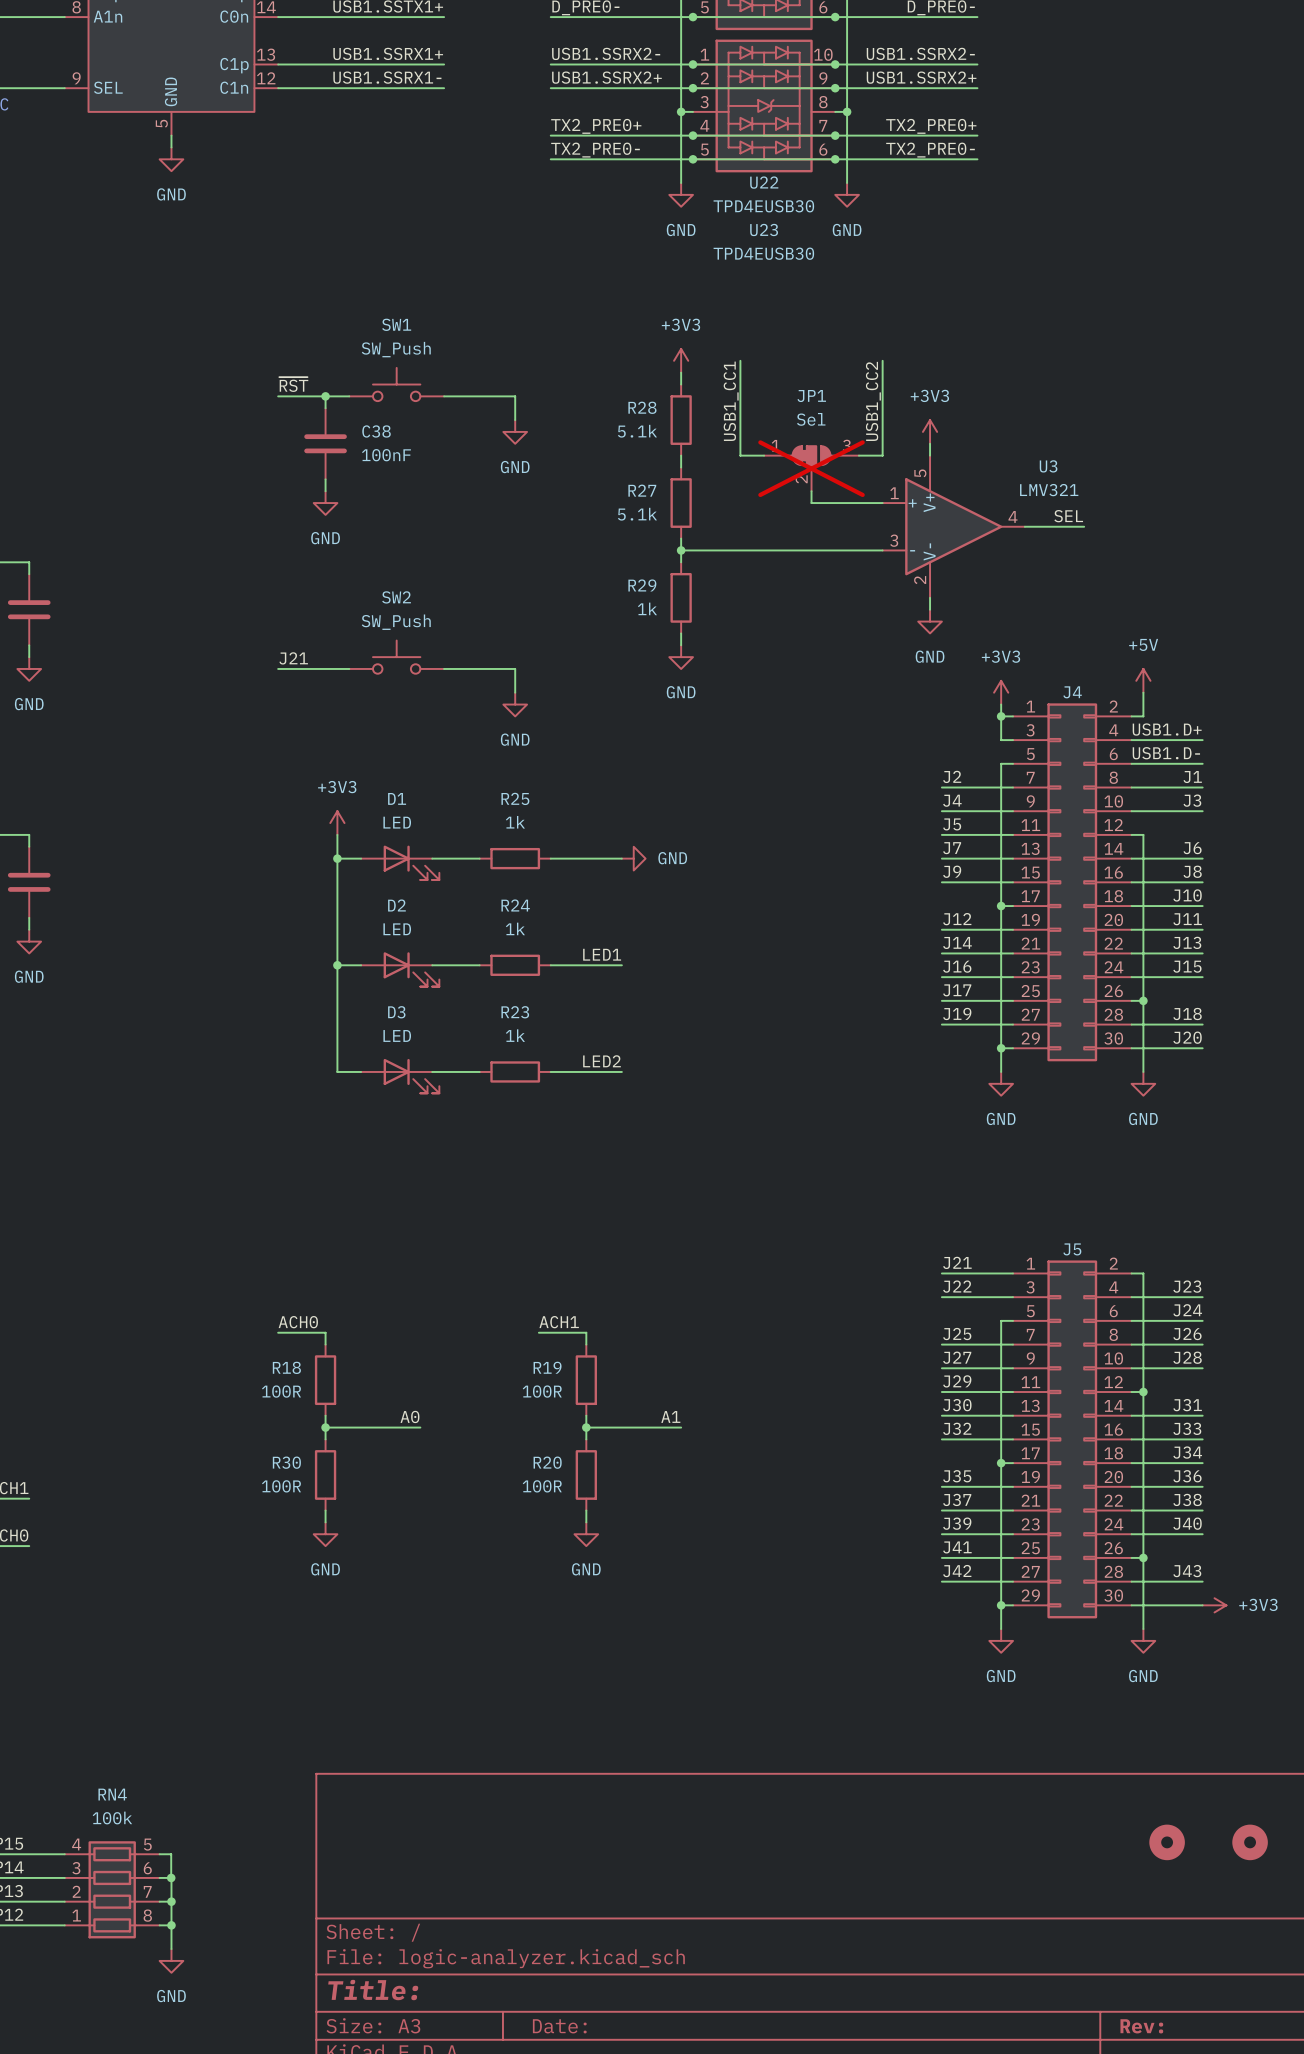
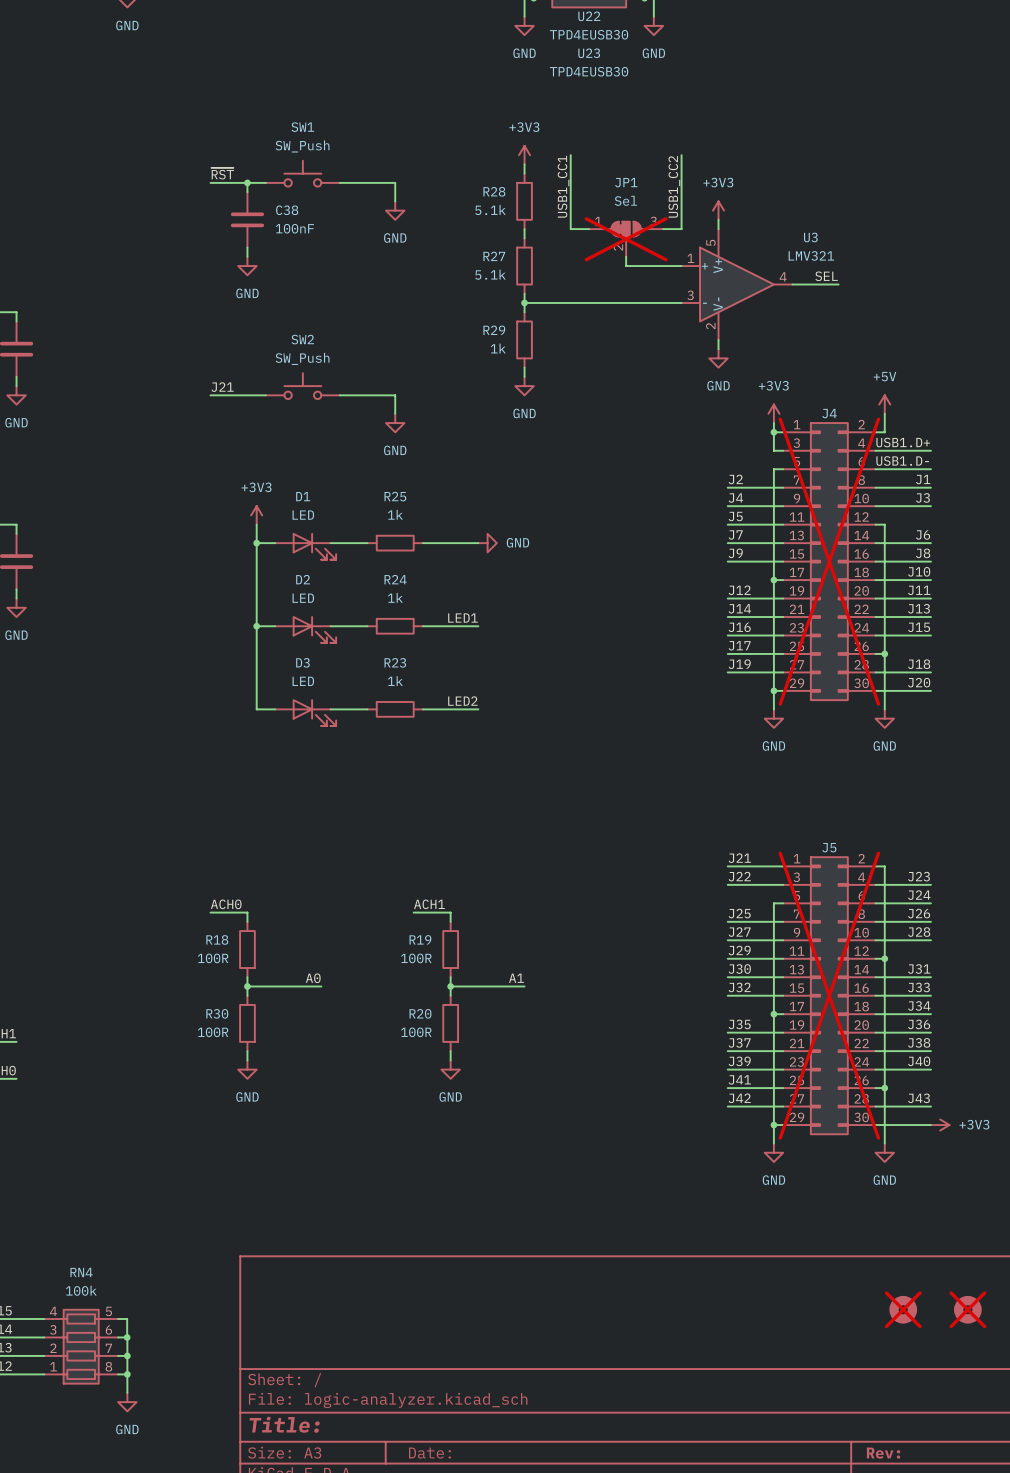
J4 do-not-place cross: none -> (829, 561)
J5 do-not-place cross: none -> (829, 995)
part do-not-place cross: none -> (903, 1309)
part do-not-place cross: none -> (967, 1309)

